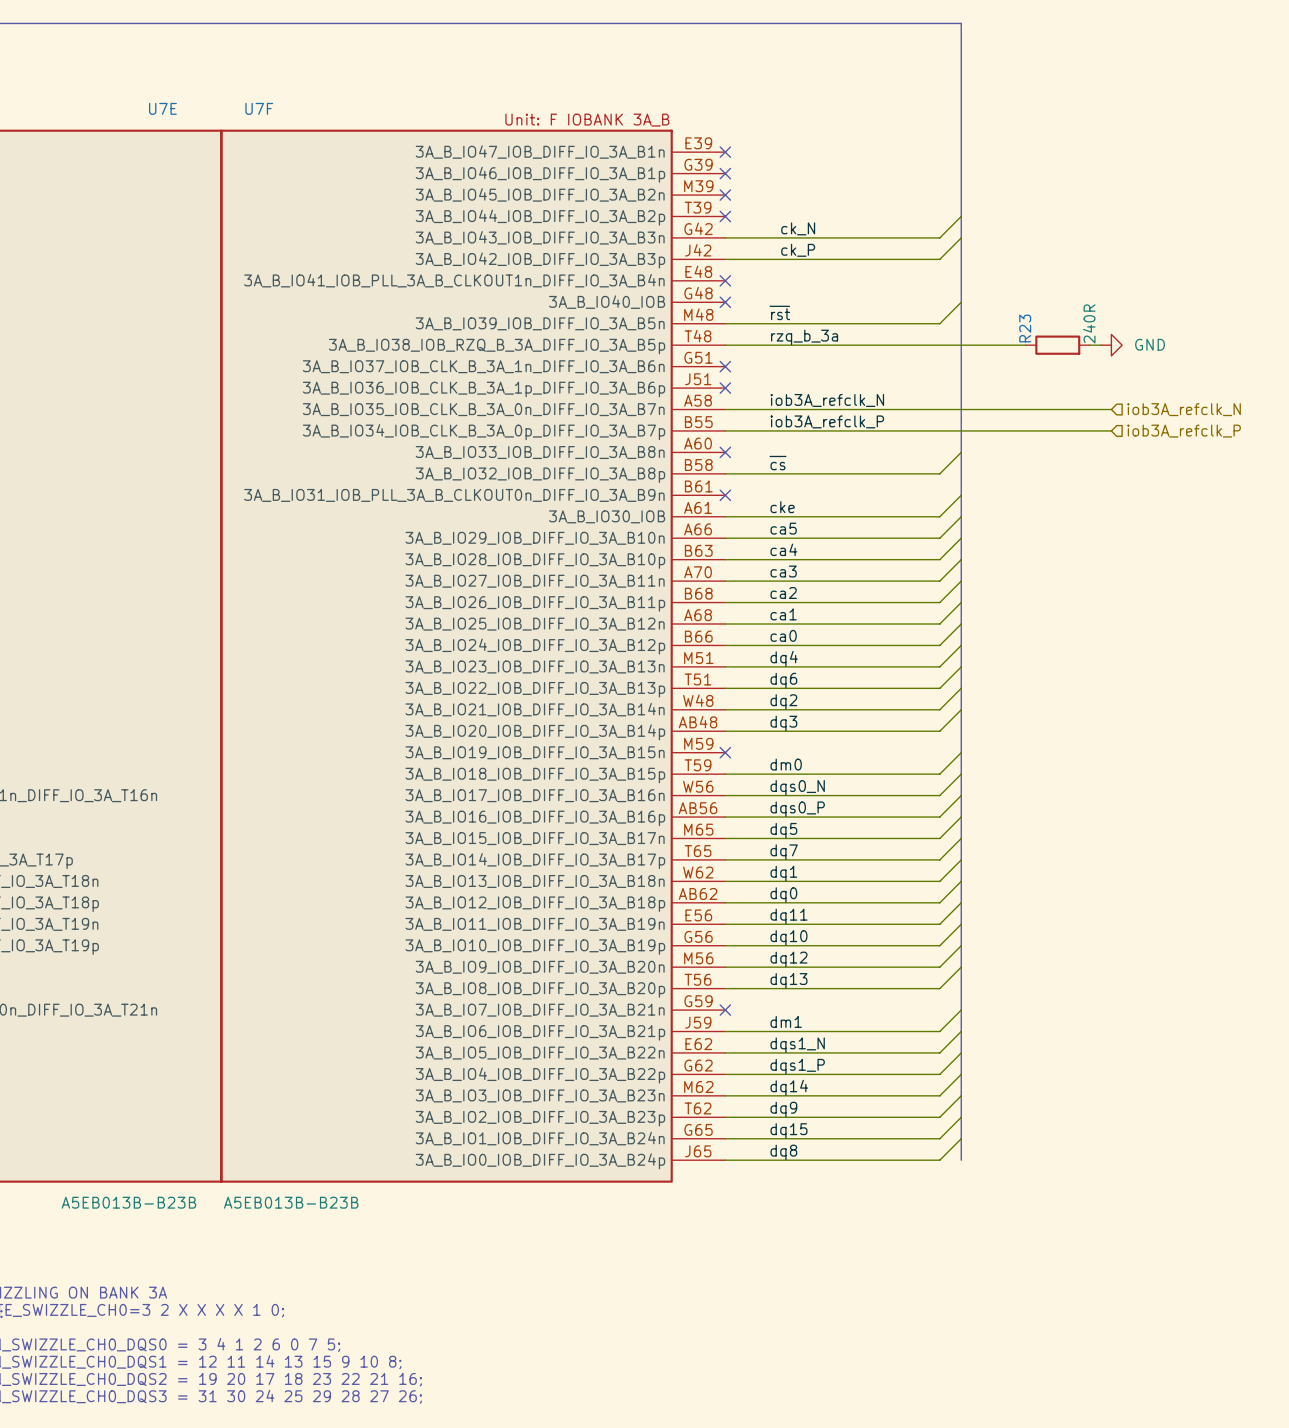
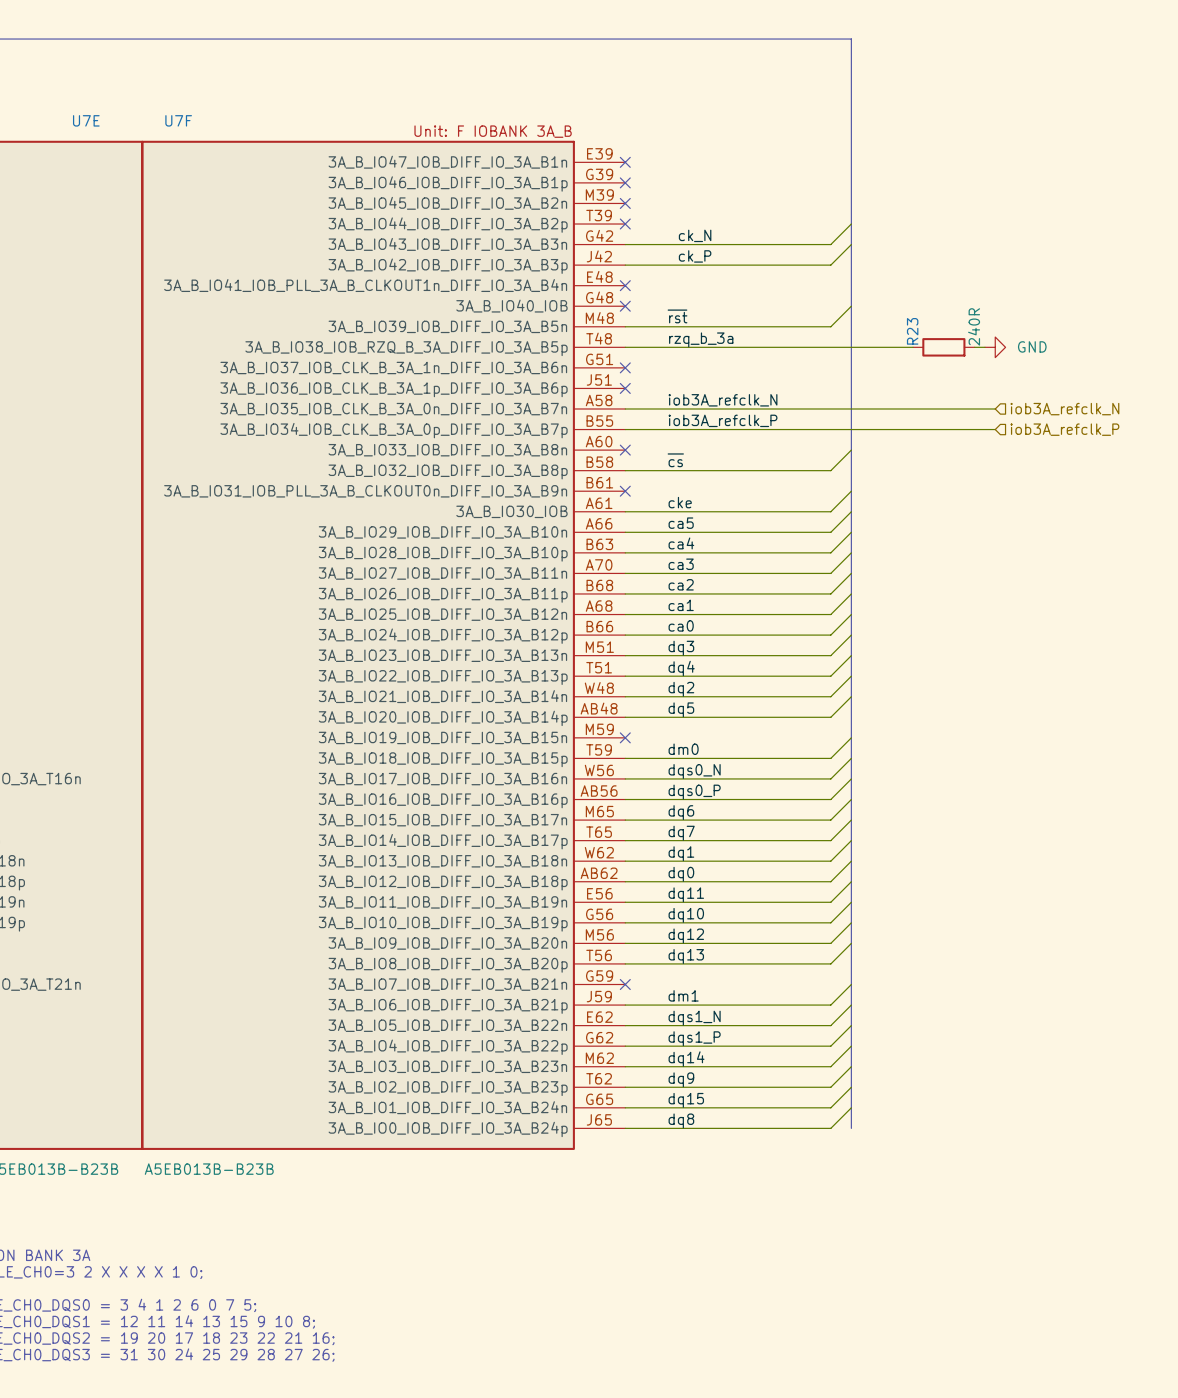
label: dq4 (784, 658) -> dq3 (681, 648)
label: dq6 (783, 680) -> dq4 (681, 668)
label: dq3 (783, 723) -> dq5 (681, 709)
label: dq5 (783, 830) -> dq6 (681, 812)

